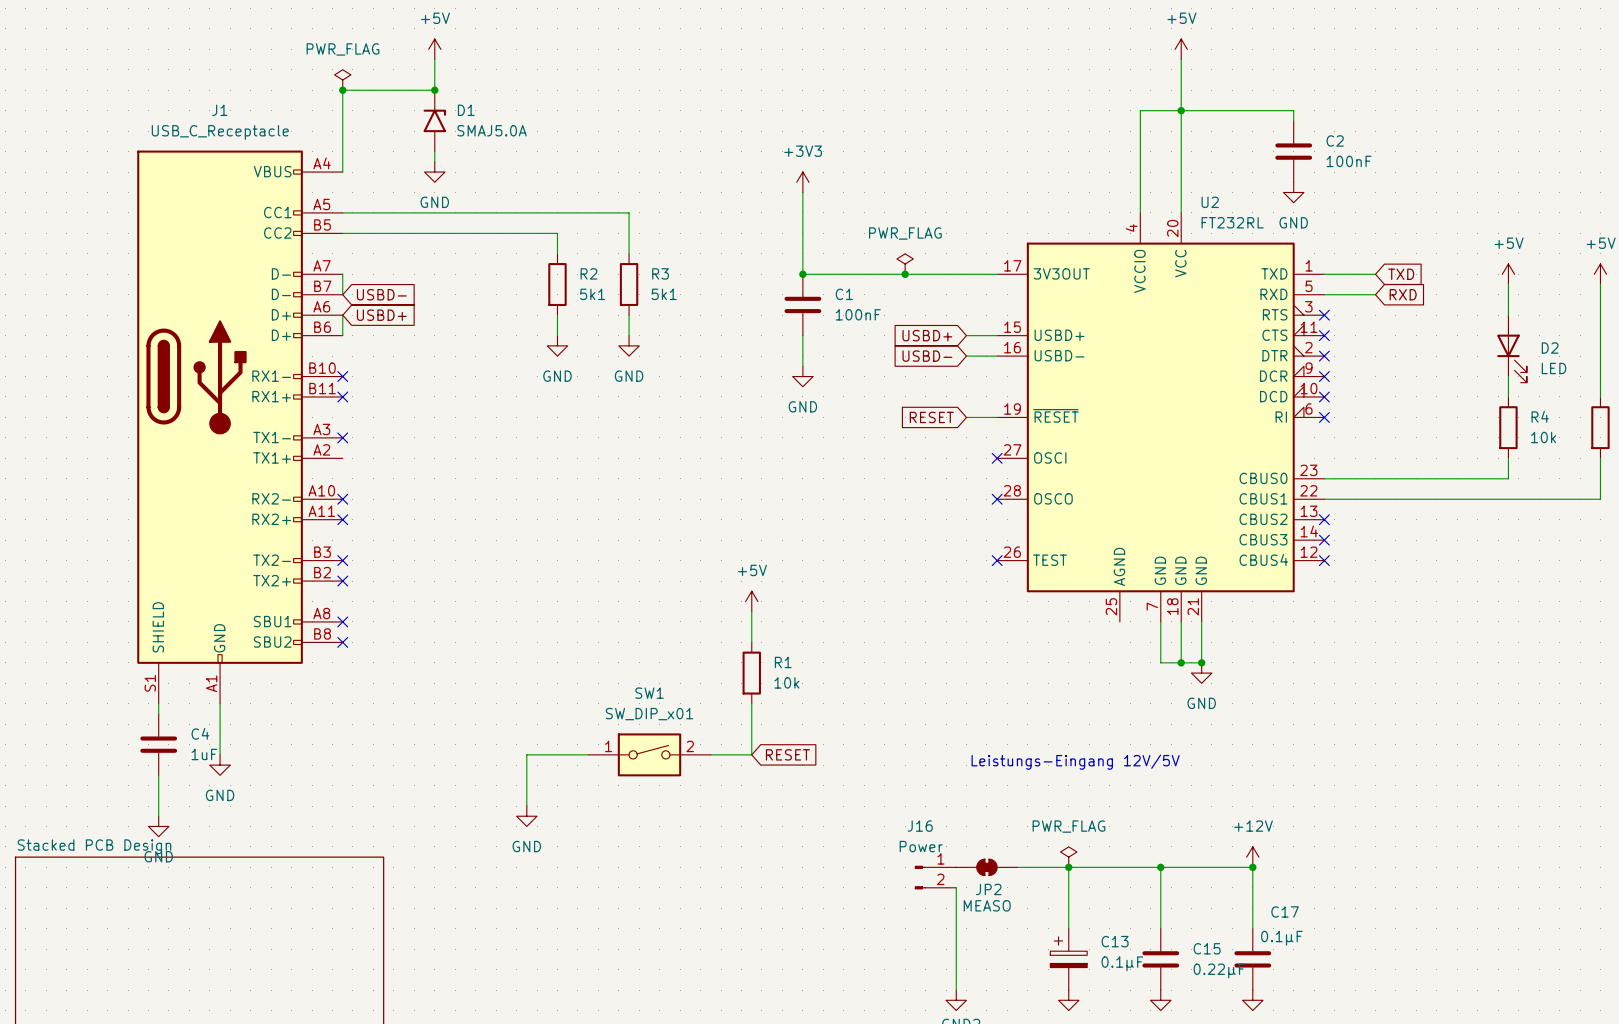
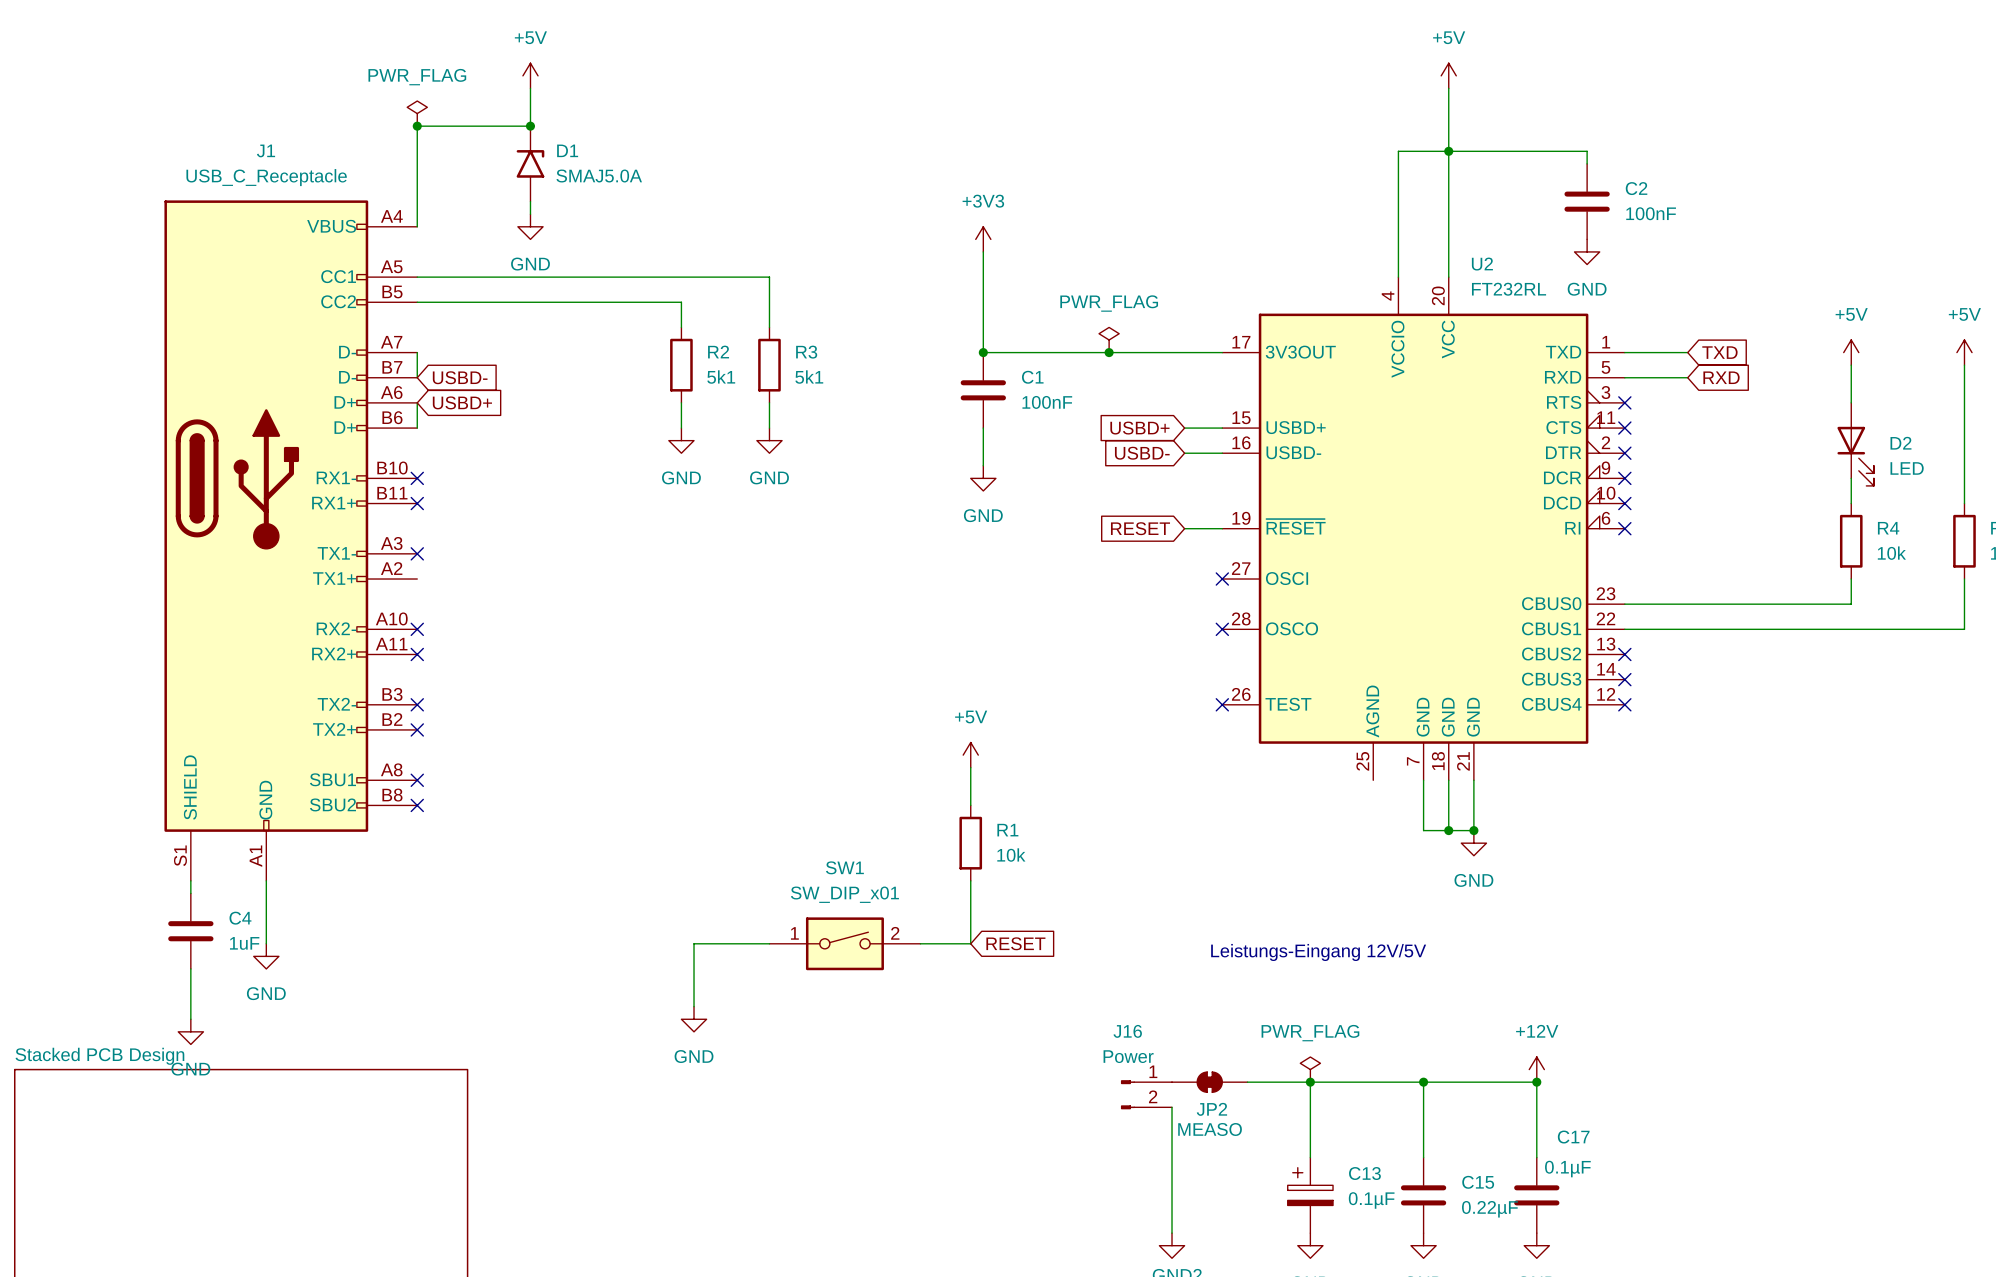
power symbol position: +5V (751, 601) -> +5V (970, 755)
wire: (751, 611) (751, 642) -> (970, 767) (970, 805)
R1 position: (751, 673) -> (970, 843)
wire: (751, 703) (751, 754) (710, 754) -> (970, 880) (970, 943) (920, 943)
wire: (567, 754) (526, 754) (526, 806) -> (694, 943) (694, 1006)
SW1 position: (649, 754) -> (844, 943)
global label position: RESET (787, 754) -> RESET (1015, 943)
power symbol position: GND (526, 816) -> GND (694, 1019)

